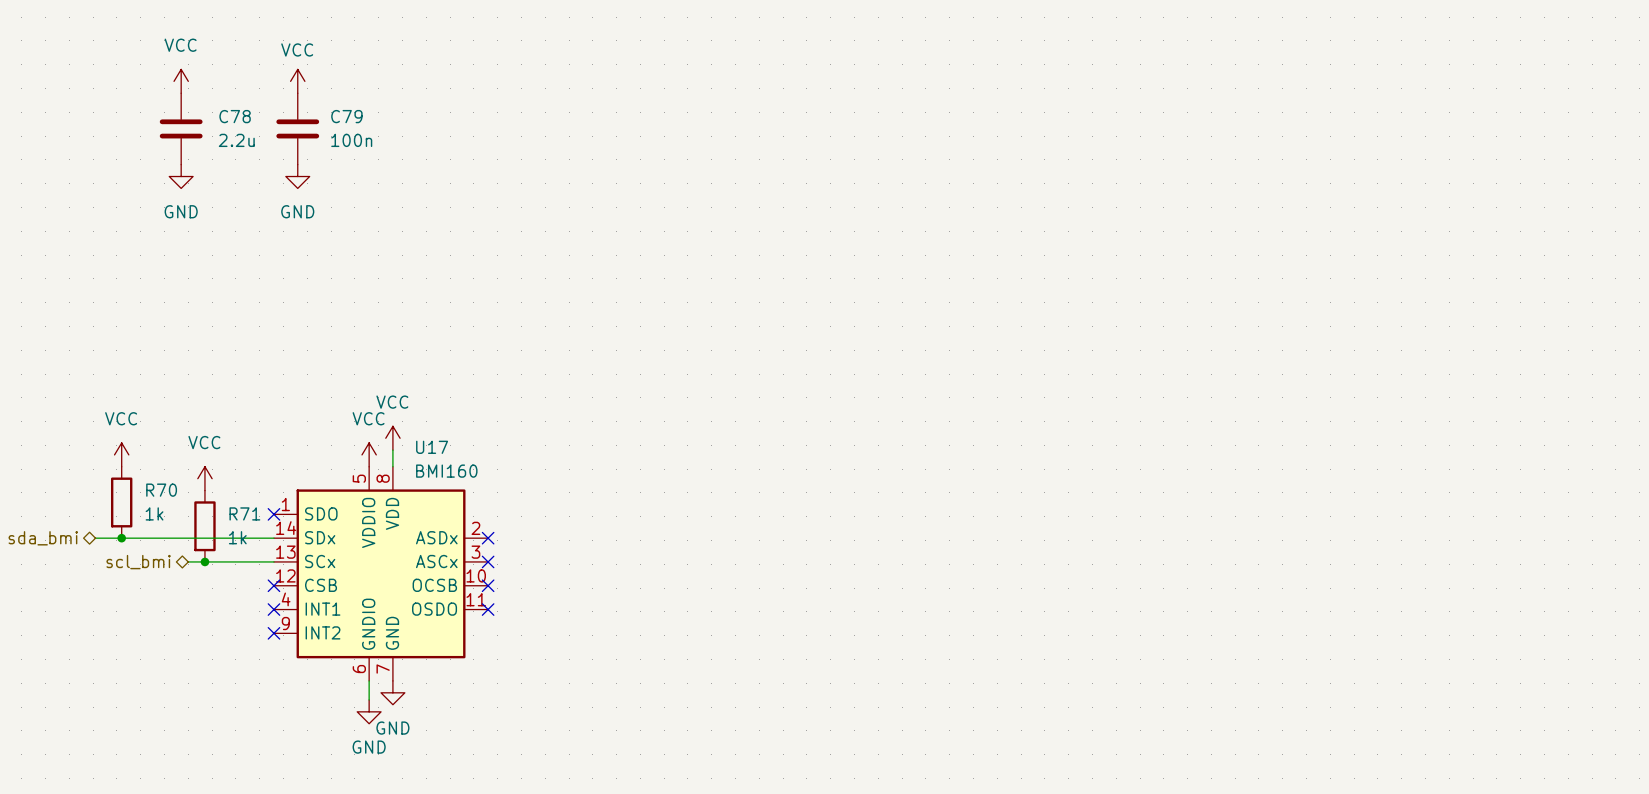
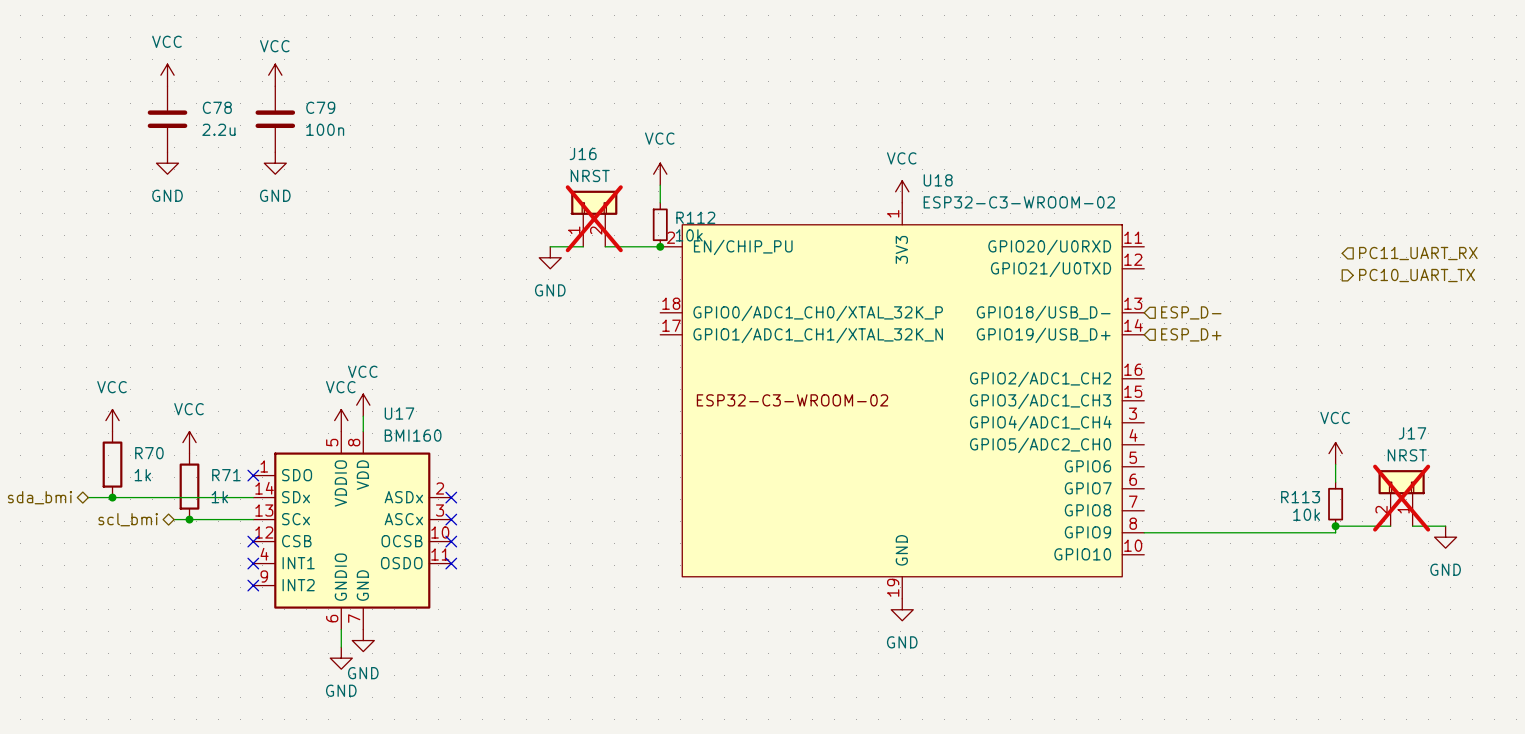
power symbol: none -> VCC (660, 174)
wire: none -> (660, 185) (660, 202)
power symbol: none -> VCC (902, 191)
J16: none -> NRST (594, 218)
R112: none -> 10k (660, 224)
wire: none -> (550, 246) (583, 246)
wire: none -> (605, 246) (660, 246)
junction: none -> (660, 246)
hierarchical label: none -> PC11_UART_RX (1418, 253)
power symbol: none -> GND (550, 257)
hierarchical label: none -> PC10_UART_TX (1417, 275)
hierarchical label: none -> ESP_D- (1191, 312)
hierarchical label: none -> ESP_D+ (1191, 334)
U18: none -> ESP32-C3-WROOM-02 (902, 400)
power symbol: none -> VCC (1335, 453)
wire: none -> (1335, 464) (1335, 482)
J17: none -> NRST (1401, 498)
R113: none -> 10k (1335, 504)
junction: none -> (1335, 526)
wire: none -> (1390, 526) (1335, 526) (1335, 532) (1144, 532)
wire: none -> (1412, 526) (1445, 526)
power symbol: none -> GND (1445, 537)
power symbol: none -> GND (902, 609)

